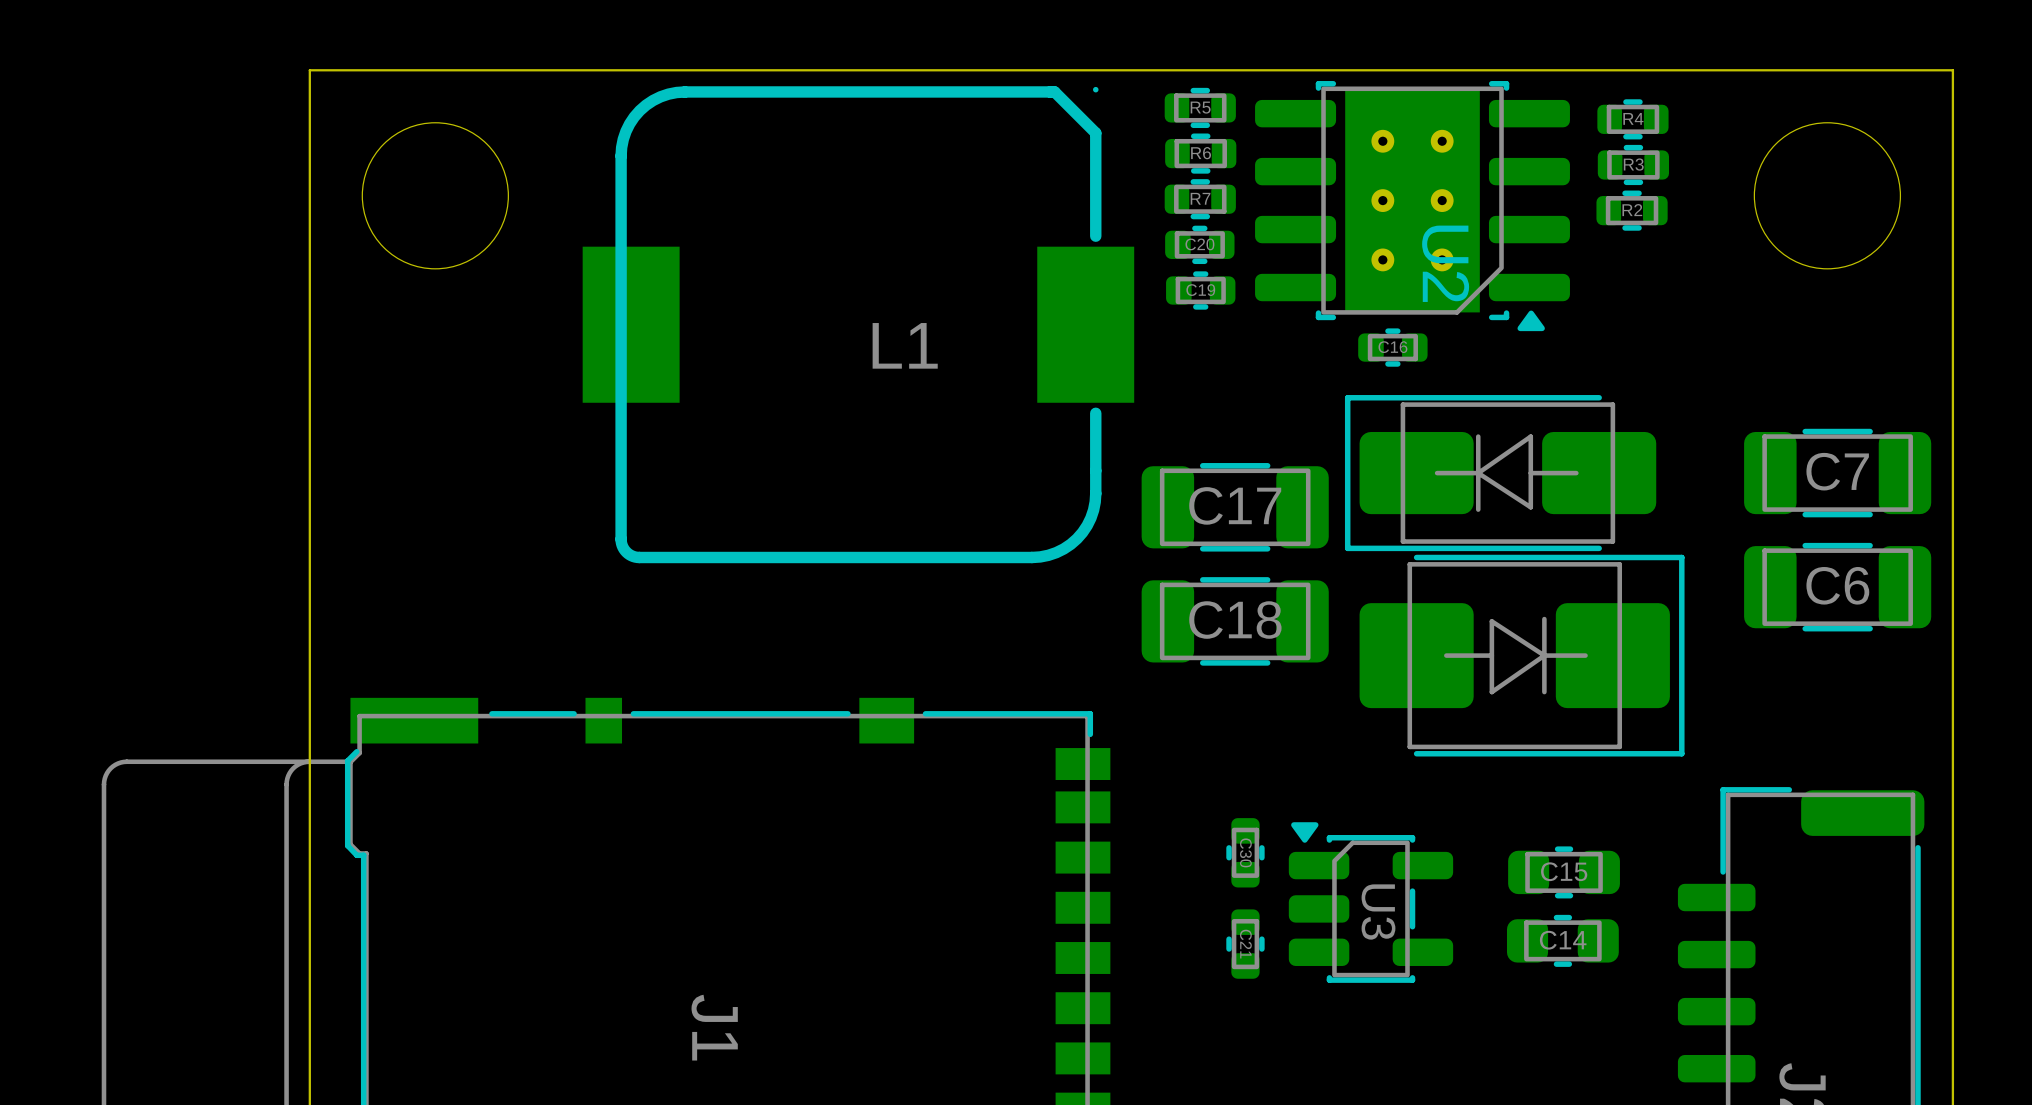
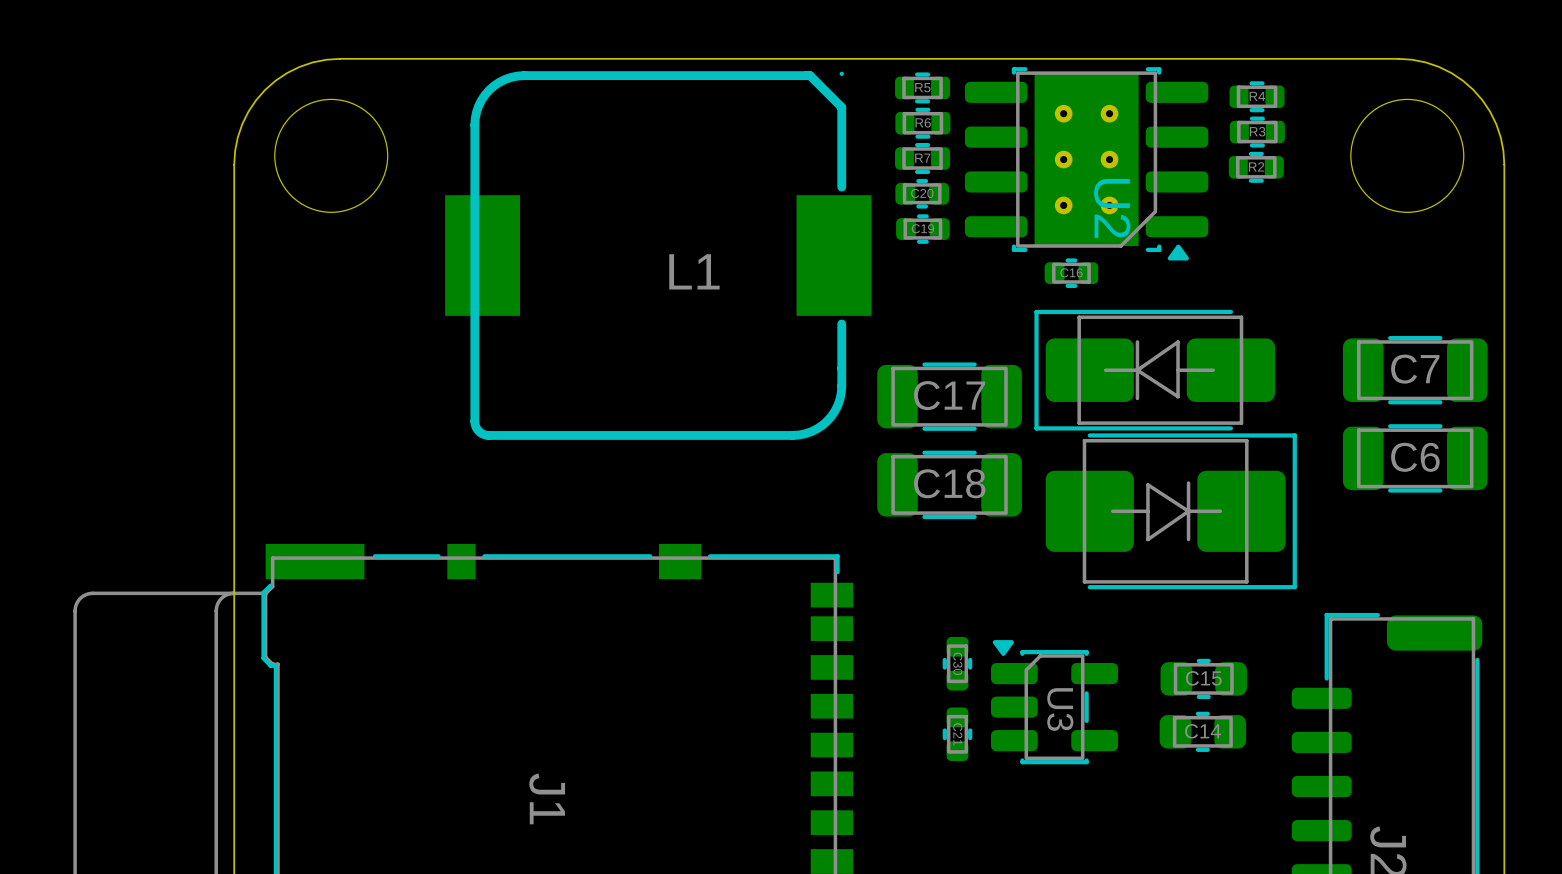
board edge: (446, 70) (309, 70) (309, 207) -> (340, 58) (312, 62) (299, 66) (275, 80) (265, 89) (256, 100) (242, 124) (237, 137) (234, 164)
board edge: (1815, 70) (1952, 70) (1952, 207) -> (1398, 58) (1425, 62) (1439, 66) (1462, 80) (1473, 89) (1490, 111) (1496, 124) (1500, 137) (1504, 164)

